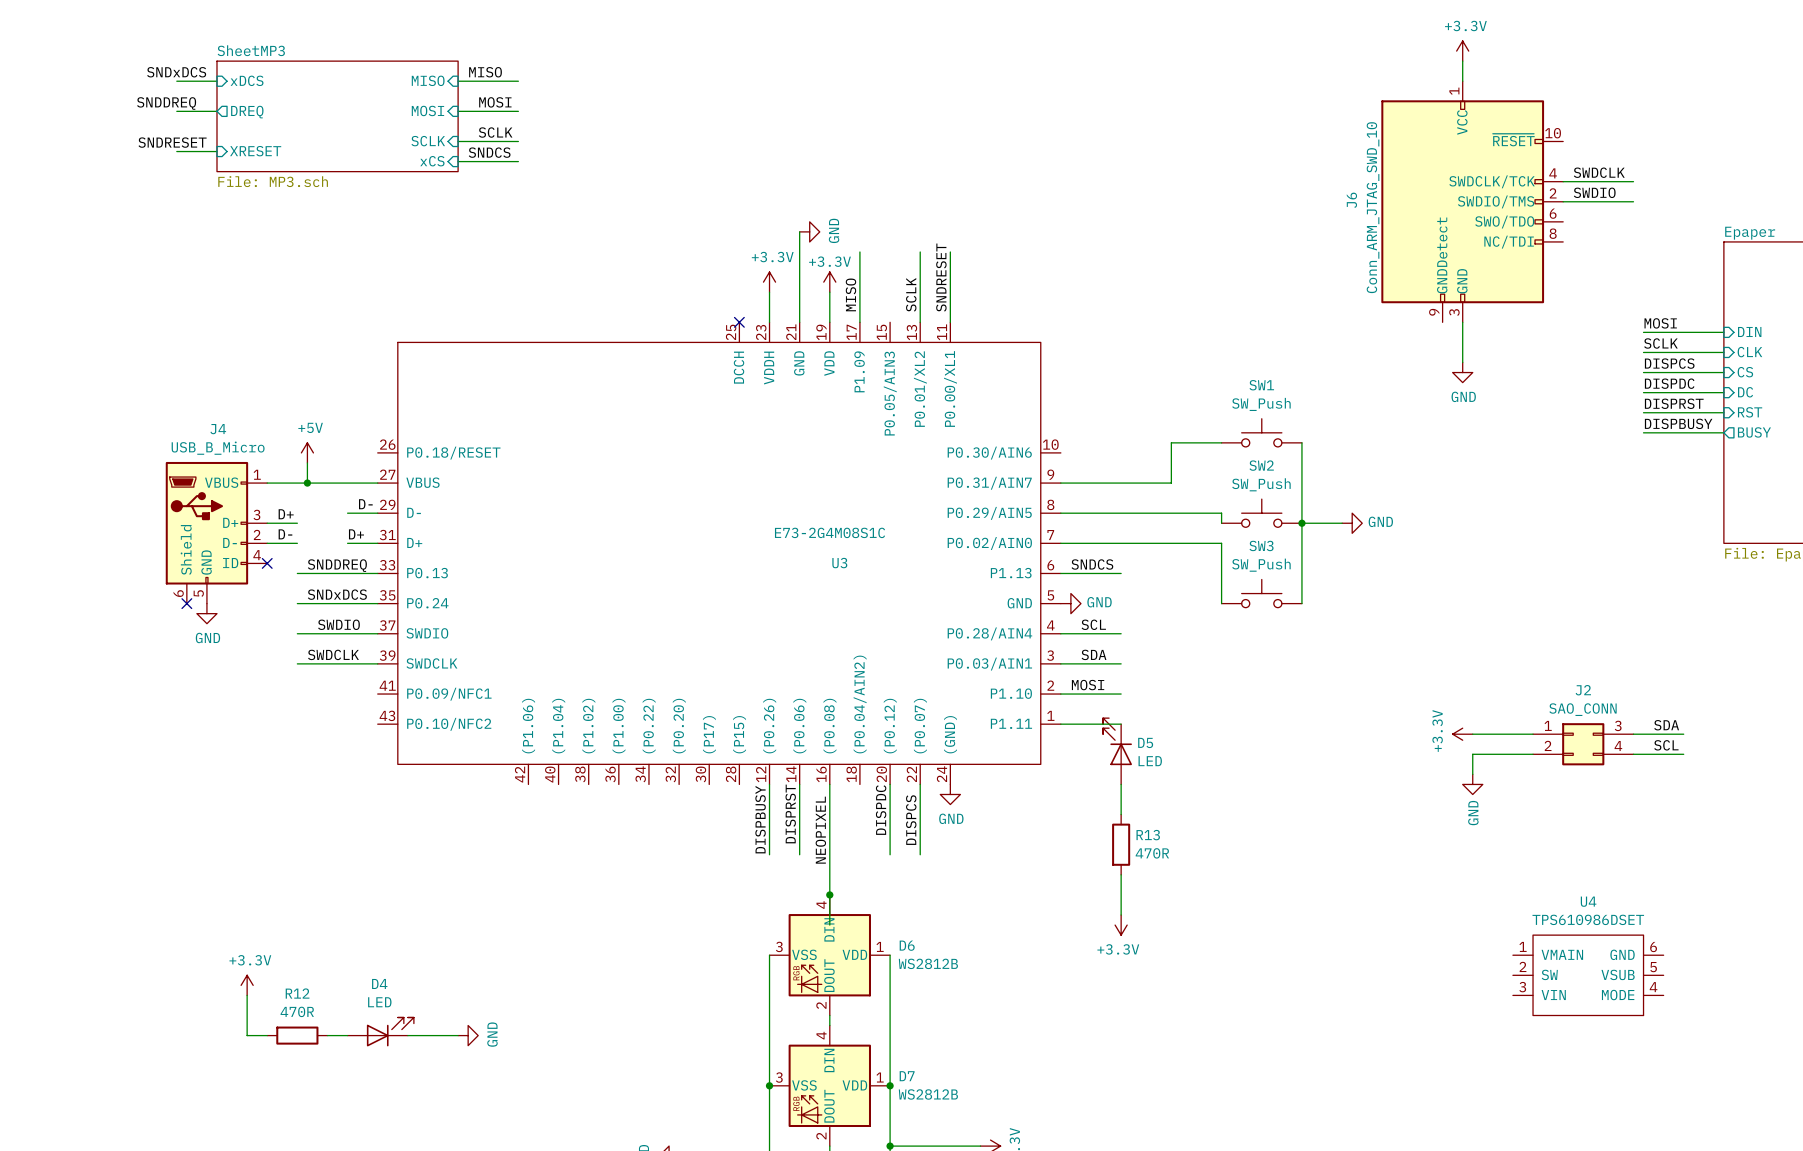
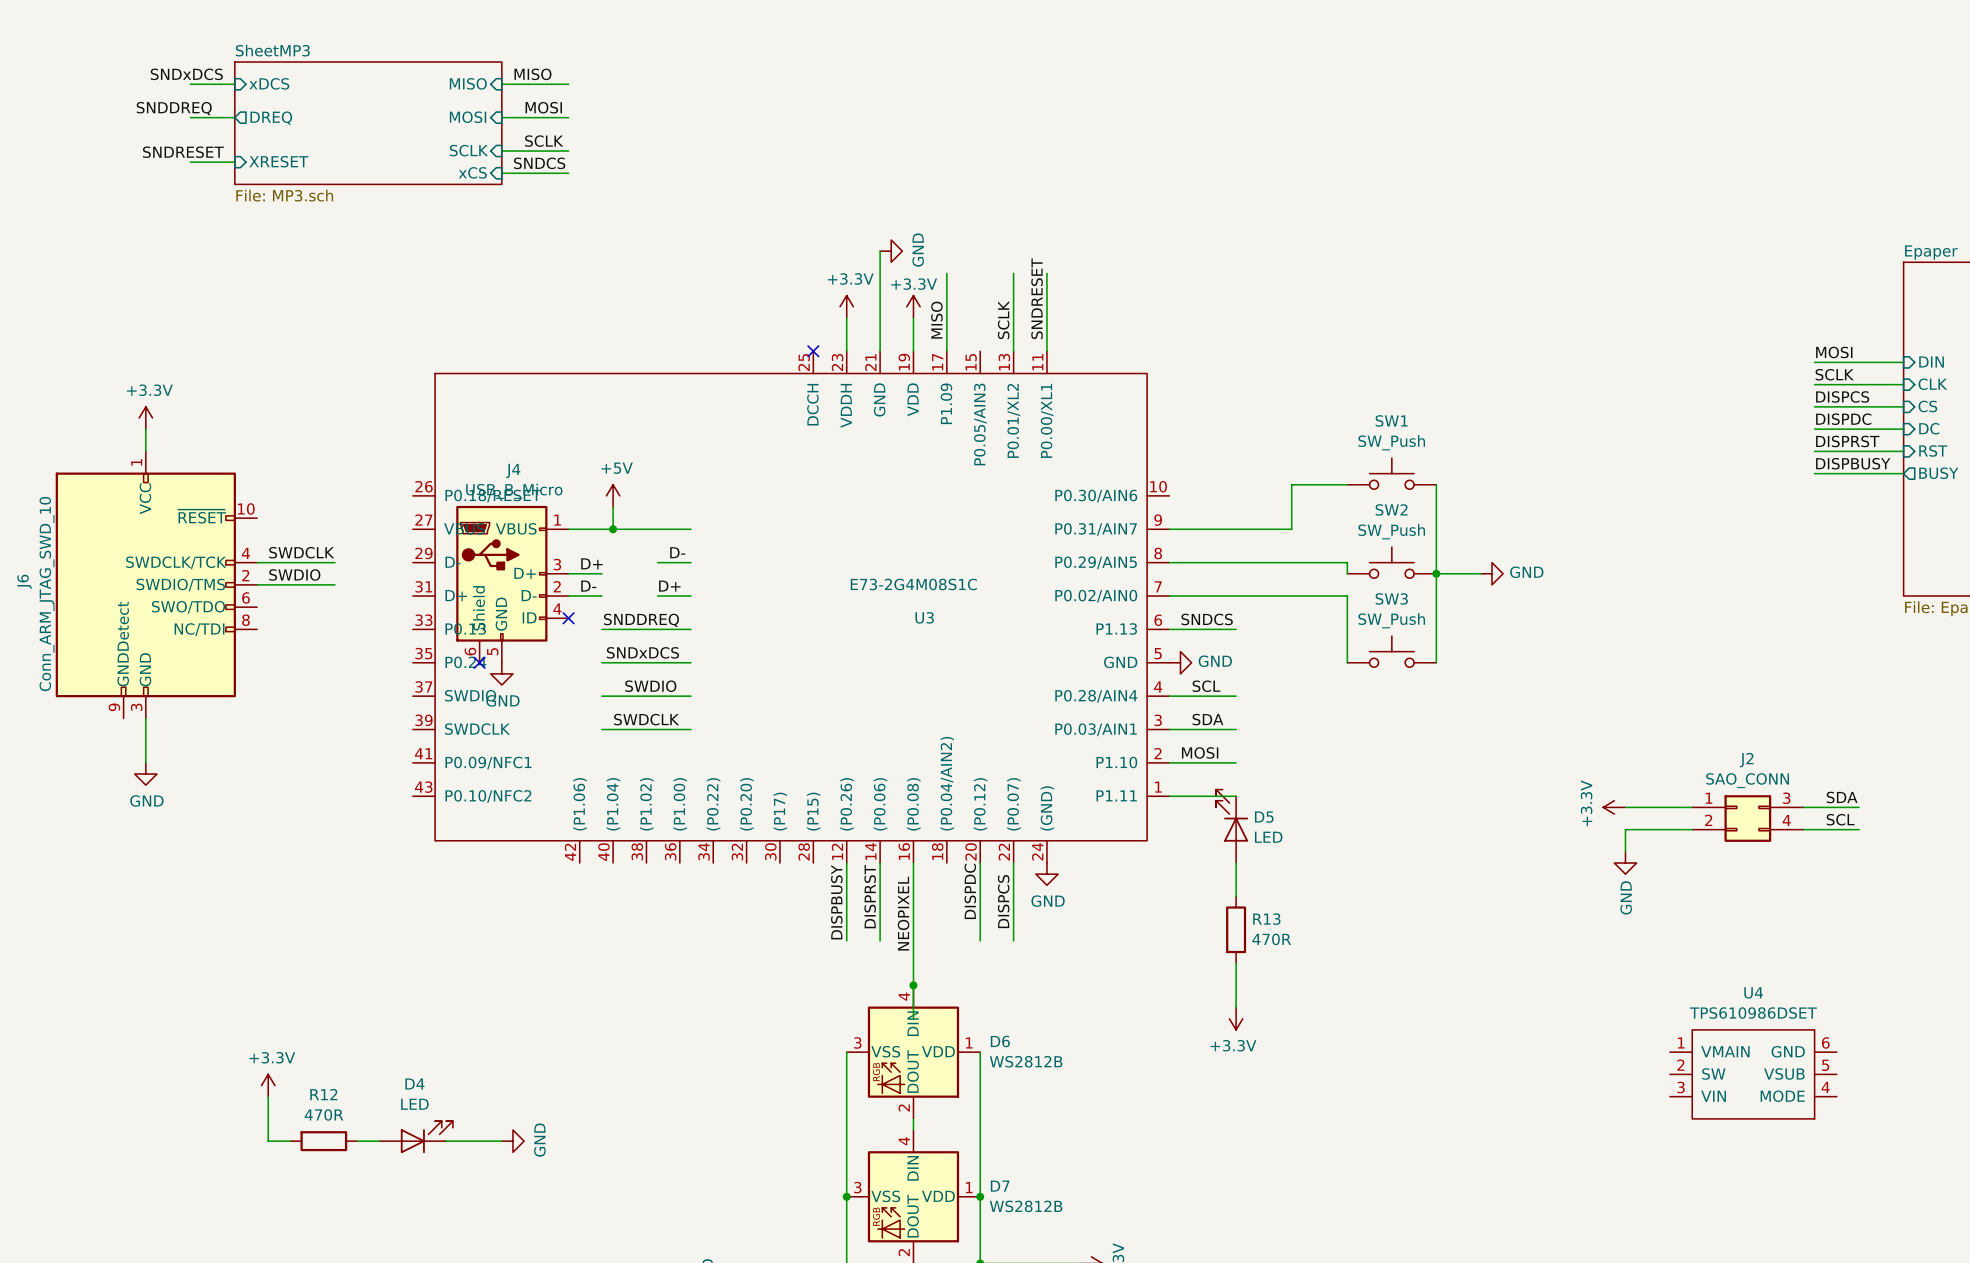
power symbol: +3.3V (1462, 51) -> none
wire: (1462, 61) (1462, 81) -> none
label: SWDCLK (1599, 172) -> none
wire: (1563, 181) (1633, 181) -> none
label: SWDIO (1594, 192) -> none
J6 position: (1472, 201) -> (156, 584)
wire: (1563, 201) (1633, 201) -> none
wire: (1462, 322) (1462, 362) -> none
power symbol: GND (1462, 372) -> none
power symbol: none -> +3.3V (145, 418)
power symbol: +5V (307, 452) -> none
power symbol: none -> +5V (613, 495)
wire: (307, 462) (307, 483) -> (145, 429) (145, 451)
wire: none -> (613, 507) (613, 529)
wire: (267, 483) (377, 483) -> none
junction: (307, 483) -> none
wire: none -> (568, 529) (690, 529)
junction: none -> (613, 529)
label: none -> SWDCLK (301, 552)
label: D- (365, 504) -> none
label: none -> D- (677, 552)
wire: none -> (257, 562) (334, 562)
wire: (347, 513) (377, 513) -> (568, 573) (601, 573)
wire: none -> (657, 562) (690, 562)
label: D+ (286, 514) -> none
label: none -> D+ (591, 563)
wire: (267, 523) (297, 523) -> none
J4 position: (216, 532) -> (512, 584)
wire: none -> (257, 584) (334, 584)
label: D- (285, 534) -> none
label: D+ (356, 534) -> none
label: none -> D- (588, 586)
label: none -> D+ (669, 586)
wire: (267, 543) (297, 543) -> none
wire: (347, 543) (377, 543) -> (568, 596) (601, 596)
wire: none -> (657, 596) (690, 596)
no-connect mark: (267, 563) -> none
no-connect mark: none -> (568, 618)
label: SNDDREQ (337, 565) -> none
label: none -> SNDDREQ (641, 620)
wire: (297, 573) (377, 573) -> none
wire: none -> (601, 629) (690, 629)
label: SNDxDCS (337, 594) -> none
label: none -> SNDxDCS (642, 652)
no-connect mark: (186, 603) -> none
wire: (297, 603) (377, 603) -> none
no-connect mark: none -> (479, 662)
wire: none -> (601, 662) (690, 662)
power symbol position: GND (206, 613) -> GND (145, 774)
power symbol: none -> GND (501, 673)
label position: SWDIO (338, 624) -> SWDIO (294, 574)
label: none -> SWDIO (650, 686)
wire: (297, 633) (377, 633) -> none
wire: none -> (601, 696) (690, 696)
wire: none -> (145, 718) (145, 762)
label: SWDCLK (333, 654) -> none
label: none -> SWDCLK (646, 719)
wire: (297, 663) (377, 663) -> none
wire: none -> (601, 729) (690, 729)

